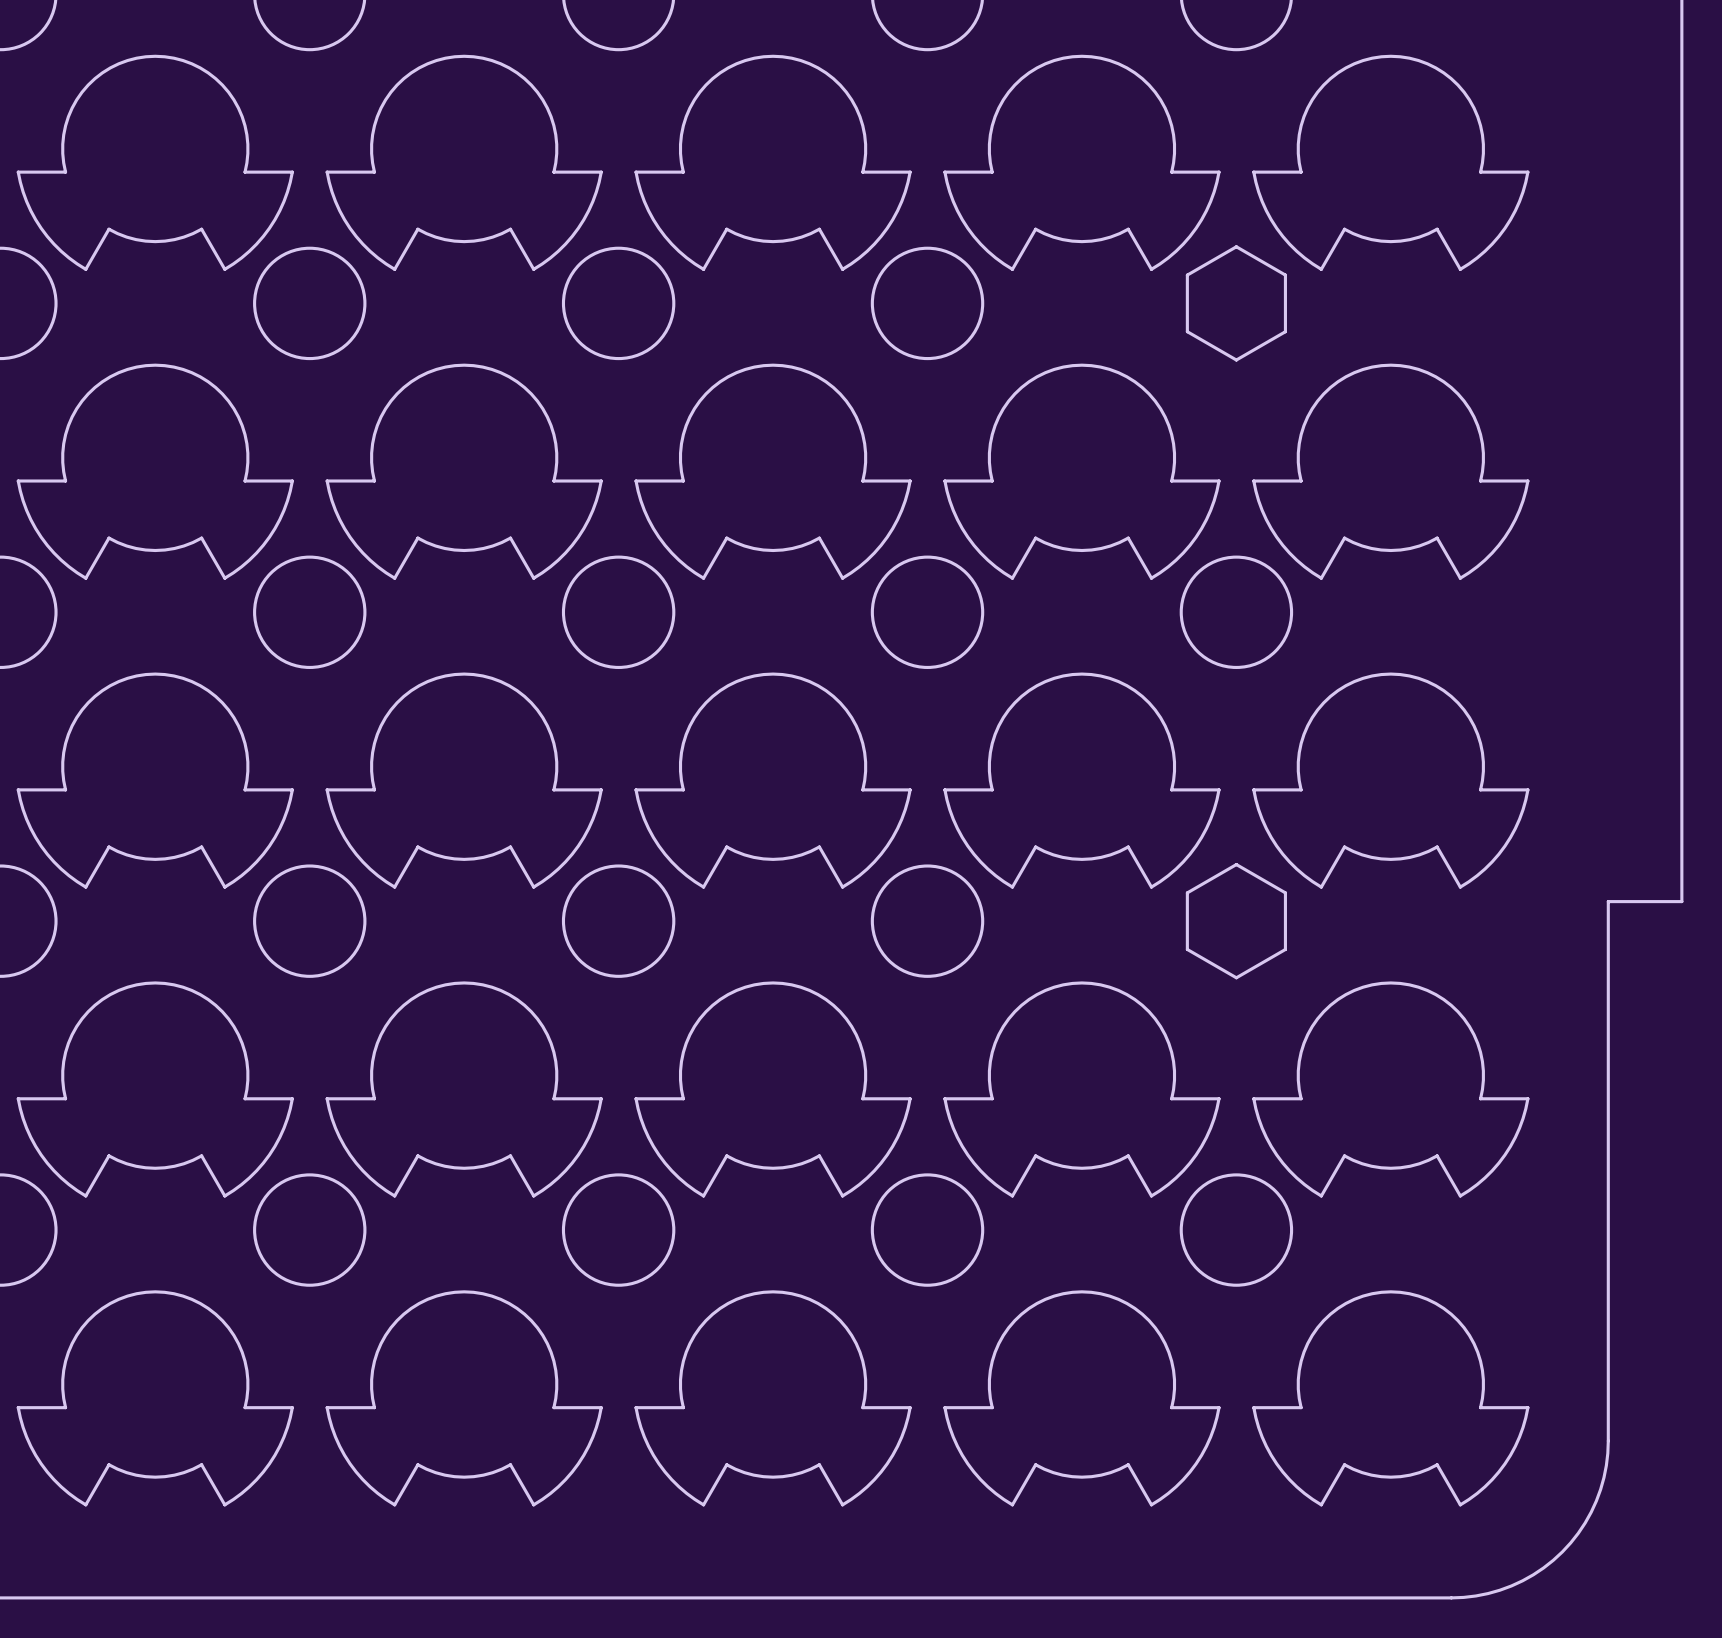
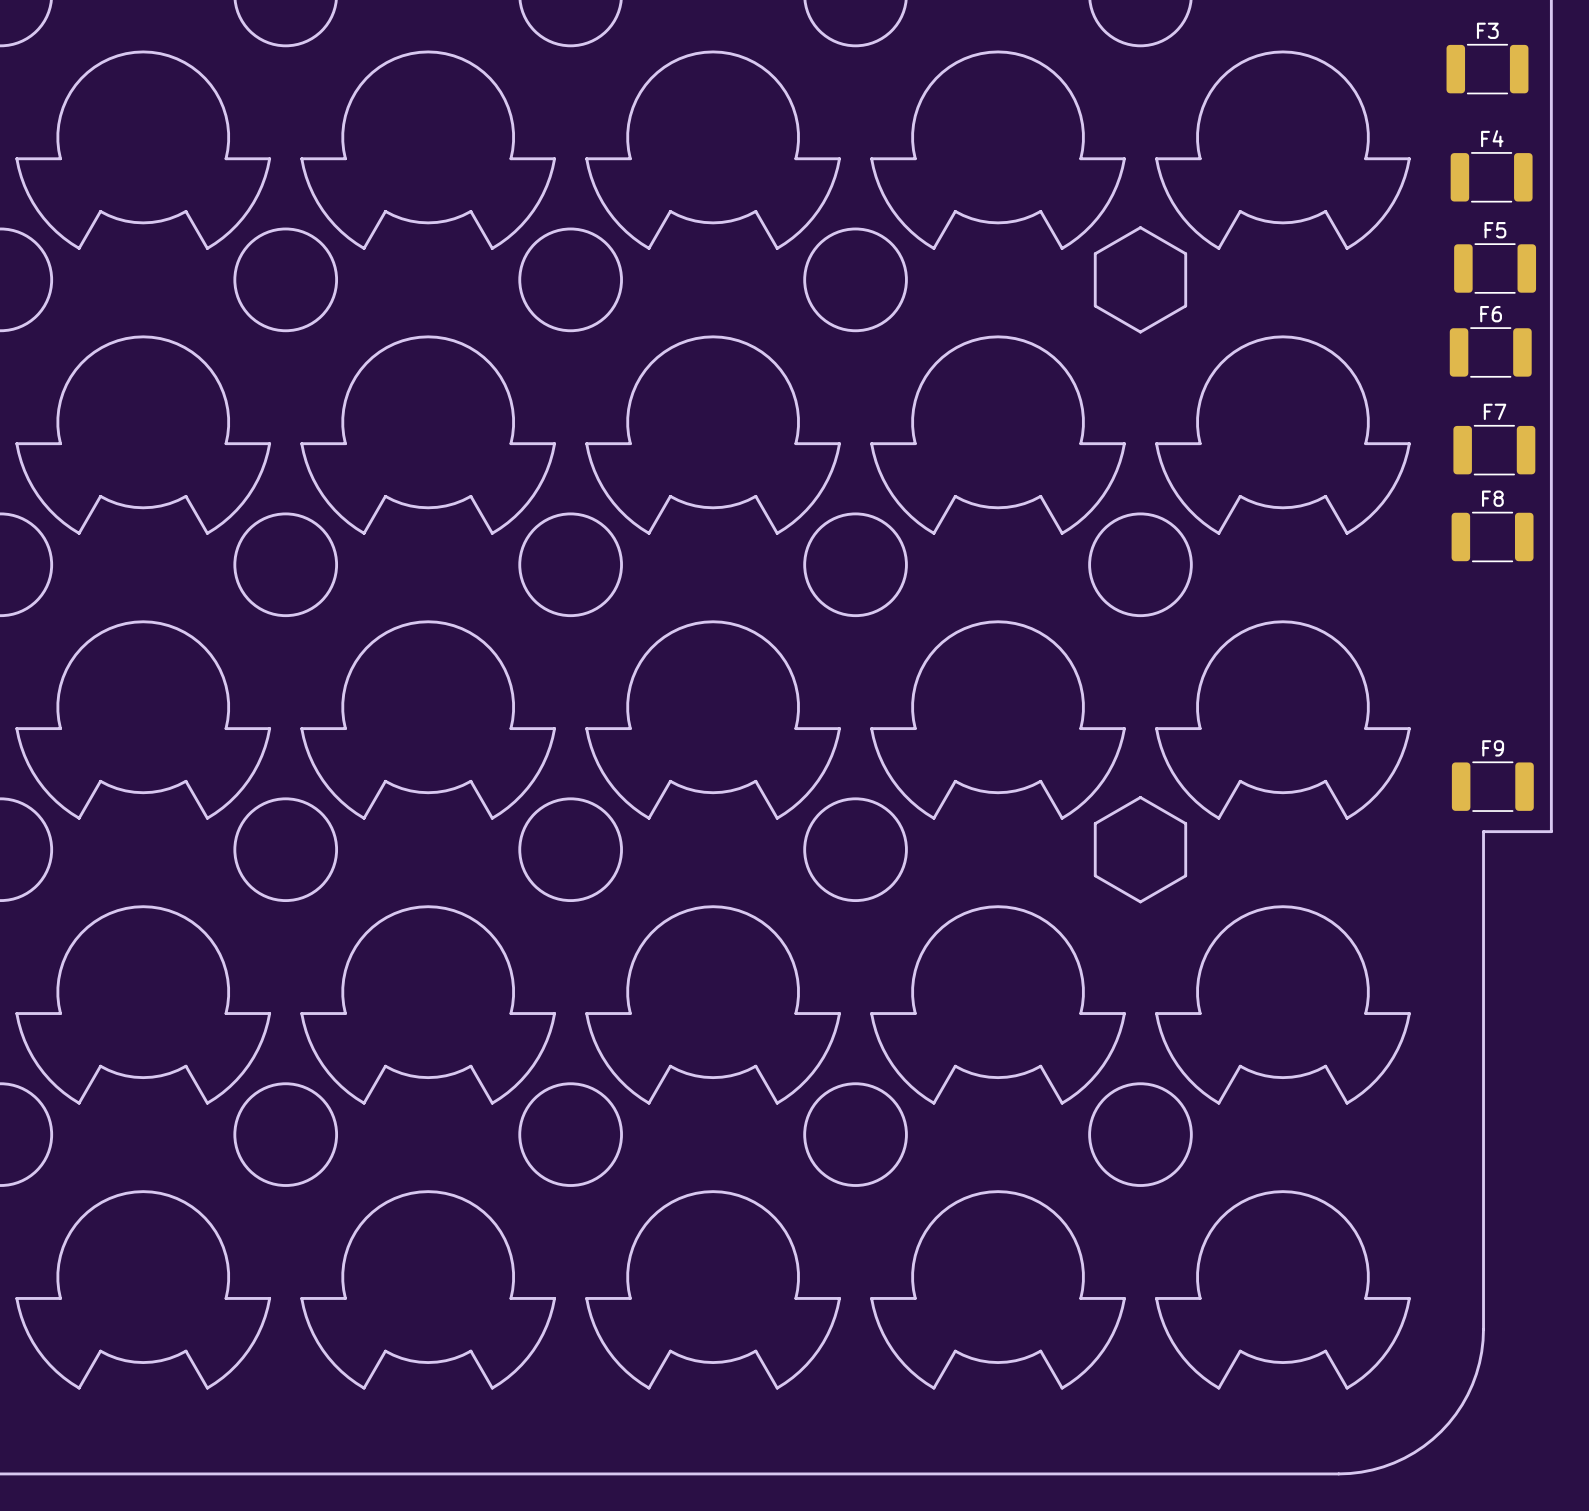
F3: none -> (1487, 69)
F4: none -> (1491, 177)
F5: none -> (1495, 268)
F6: none -> (1490, 352)
F7: none -> (1494, 450)
F8: none -> (1492, 536)
F9: none -> (1492, 786)

